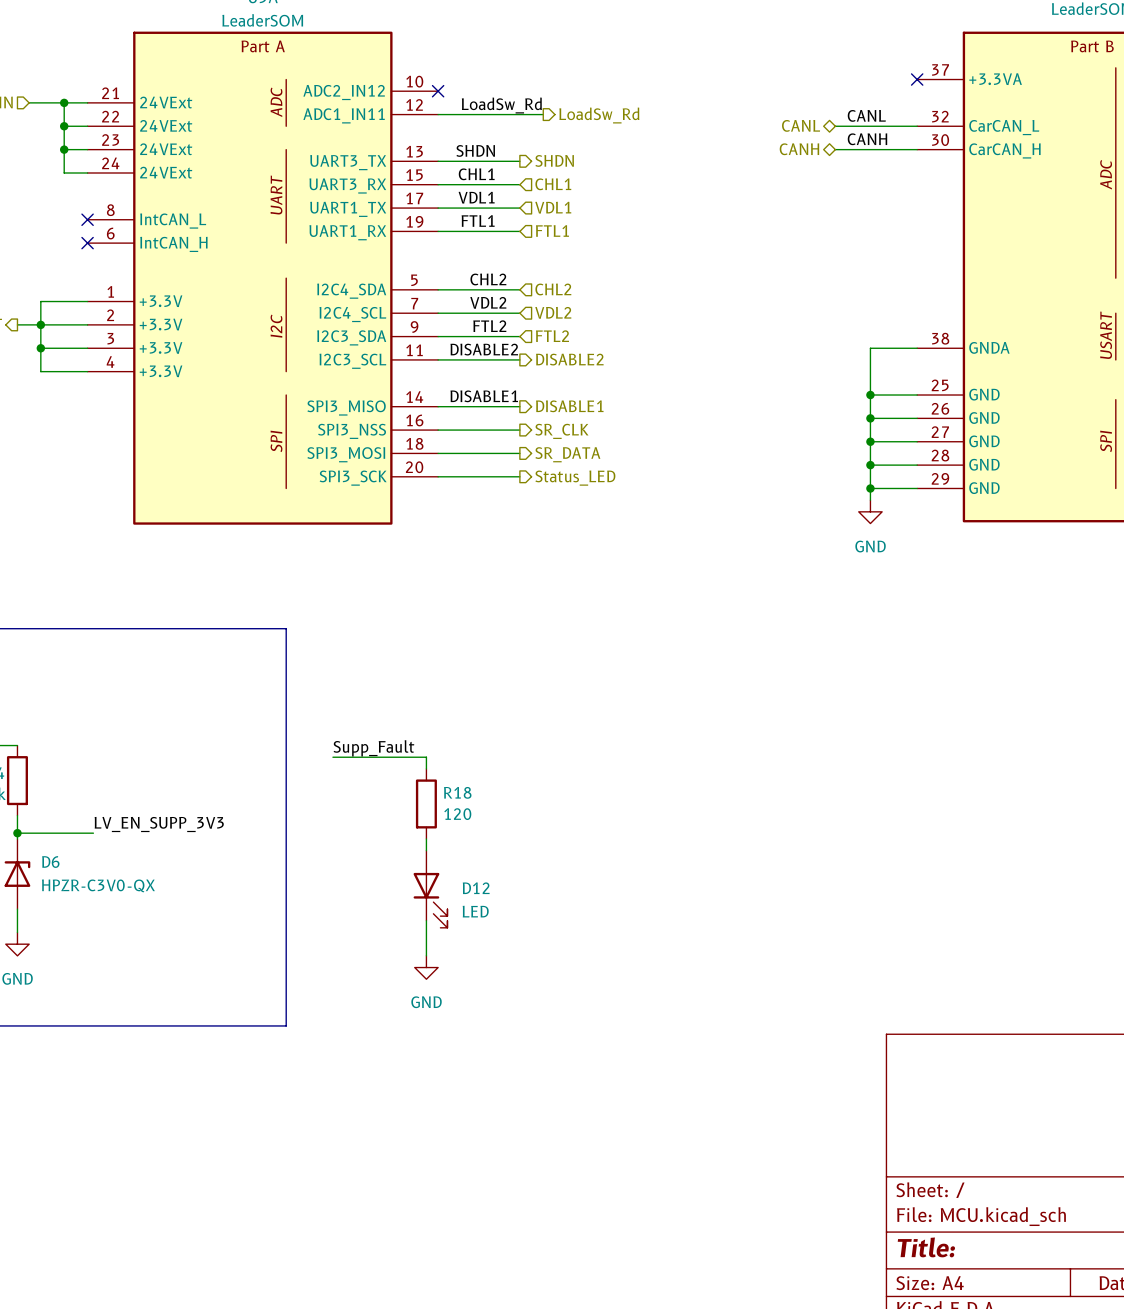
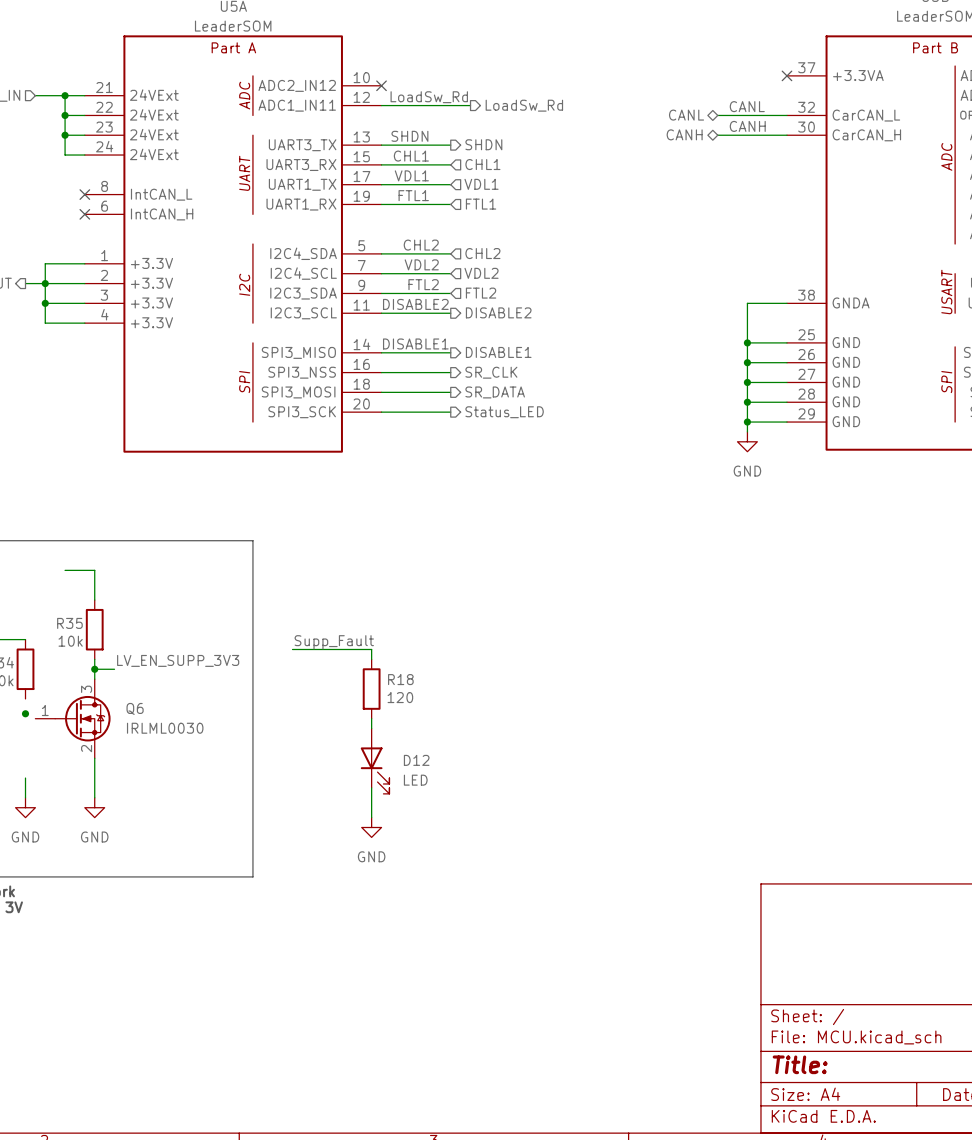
wire: none -> (65, 570) (94, 570) (94, 600)
R35: none -> 10k (94, 629)
wire: none -> (94, 669) (114, 669)
junction: none -> (94, 669)
wire: (17, 815) (17, 839) -> (94, 659) (94, 679)
label position: LV_EN_SUPP_3V3 (159, 824) -> LV_EN_SUPP_3V3 (178, 660)
wire: (17, 833) (93, 833) -> none
Q6: none -> IRLML0030 (72, 718)
D6: HPZR-C3V0-QX (17, 874) -> none
wire: none -> (94, 758) (94, 797)
power symbol: none -> GND (94, 807)

